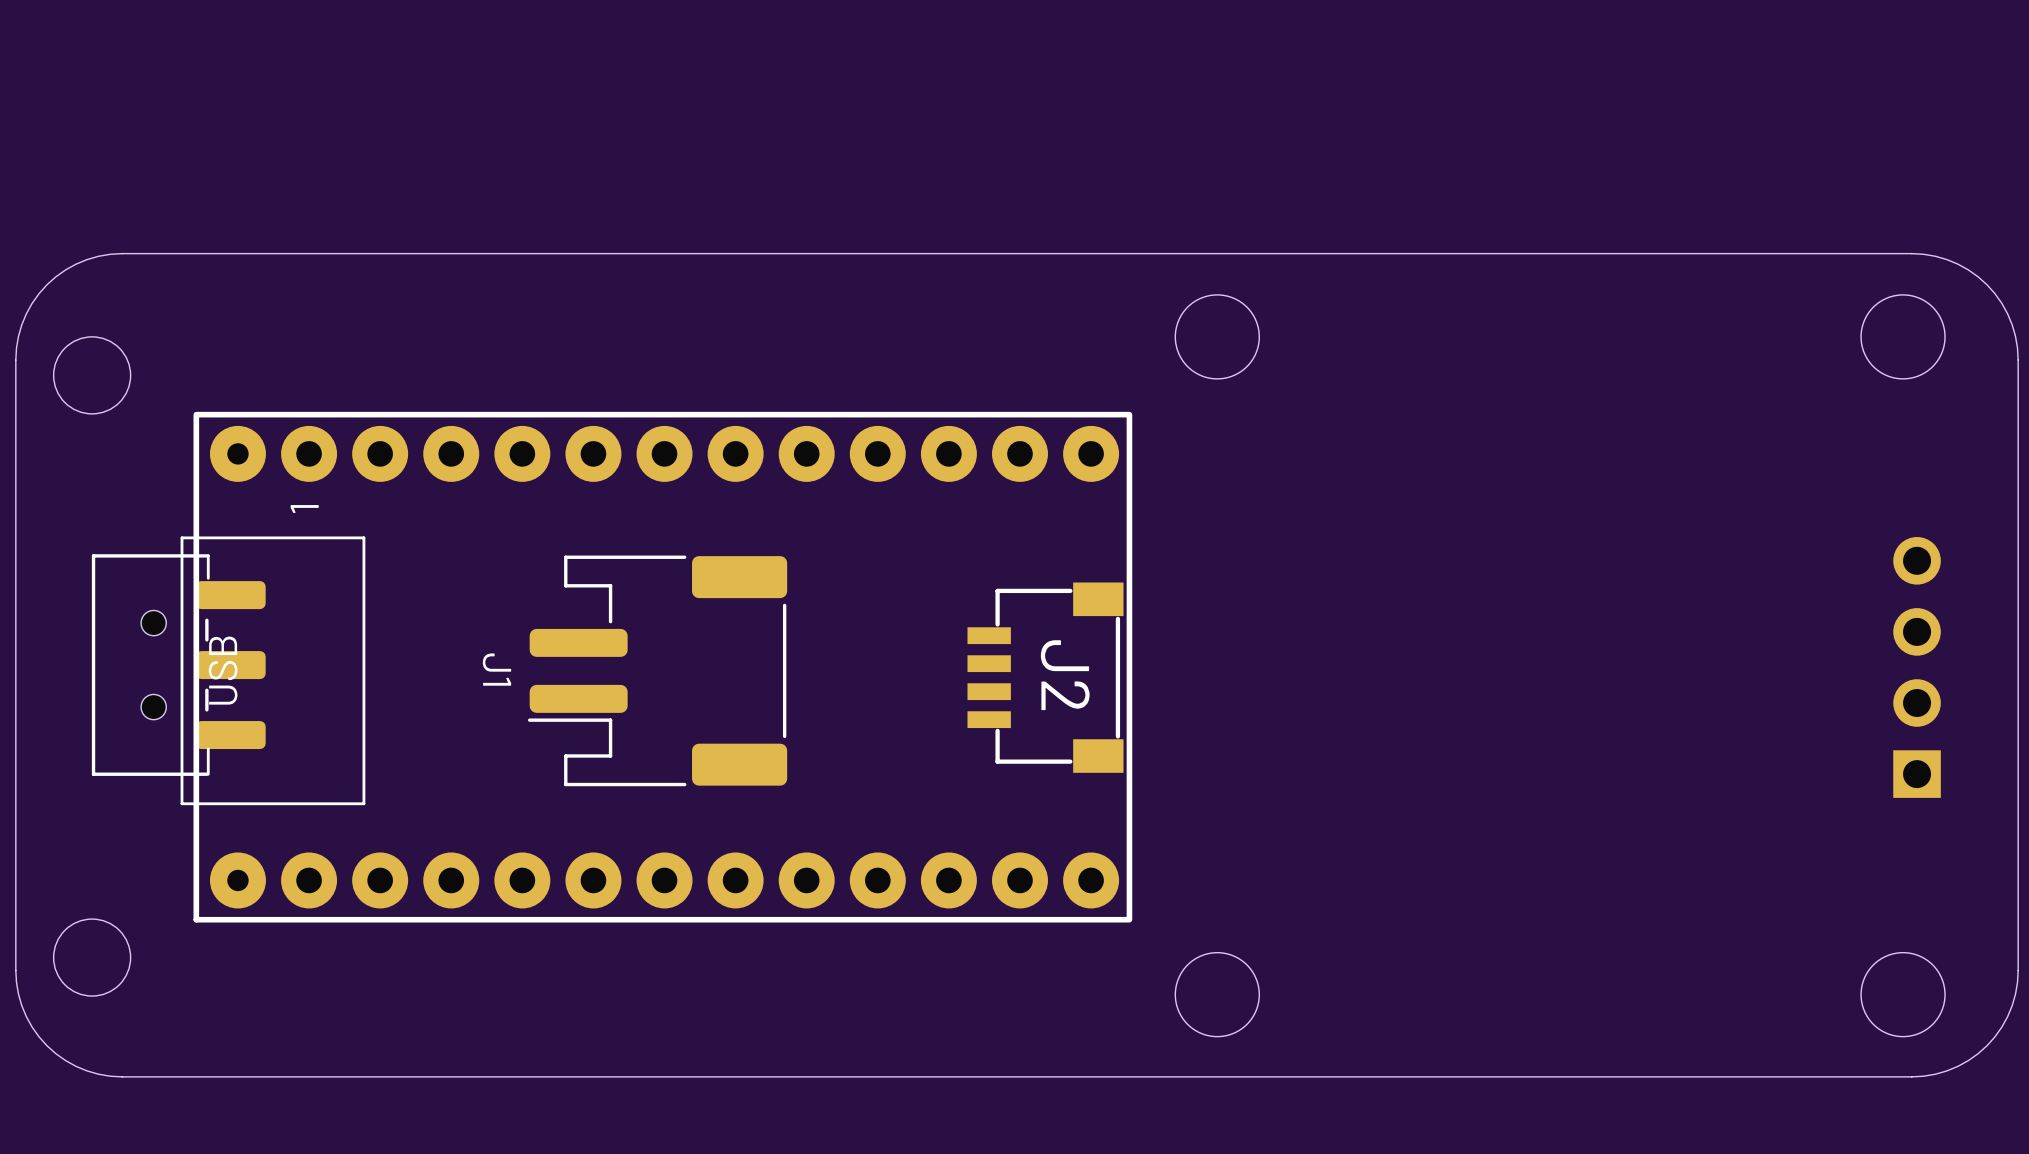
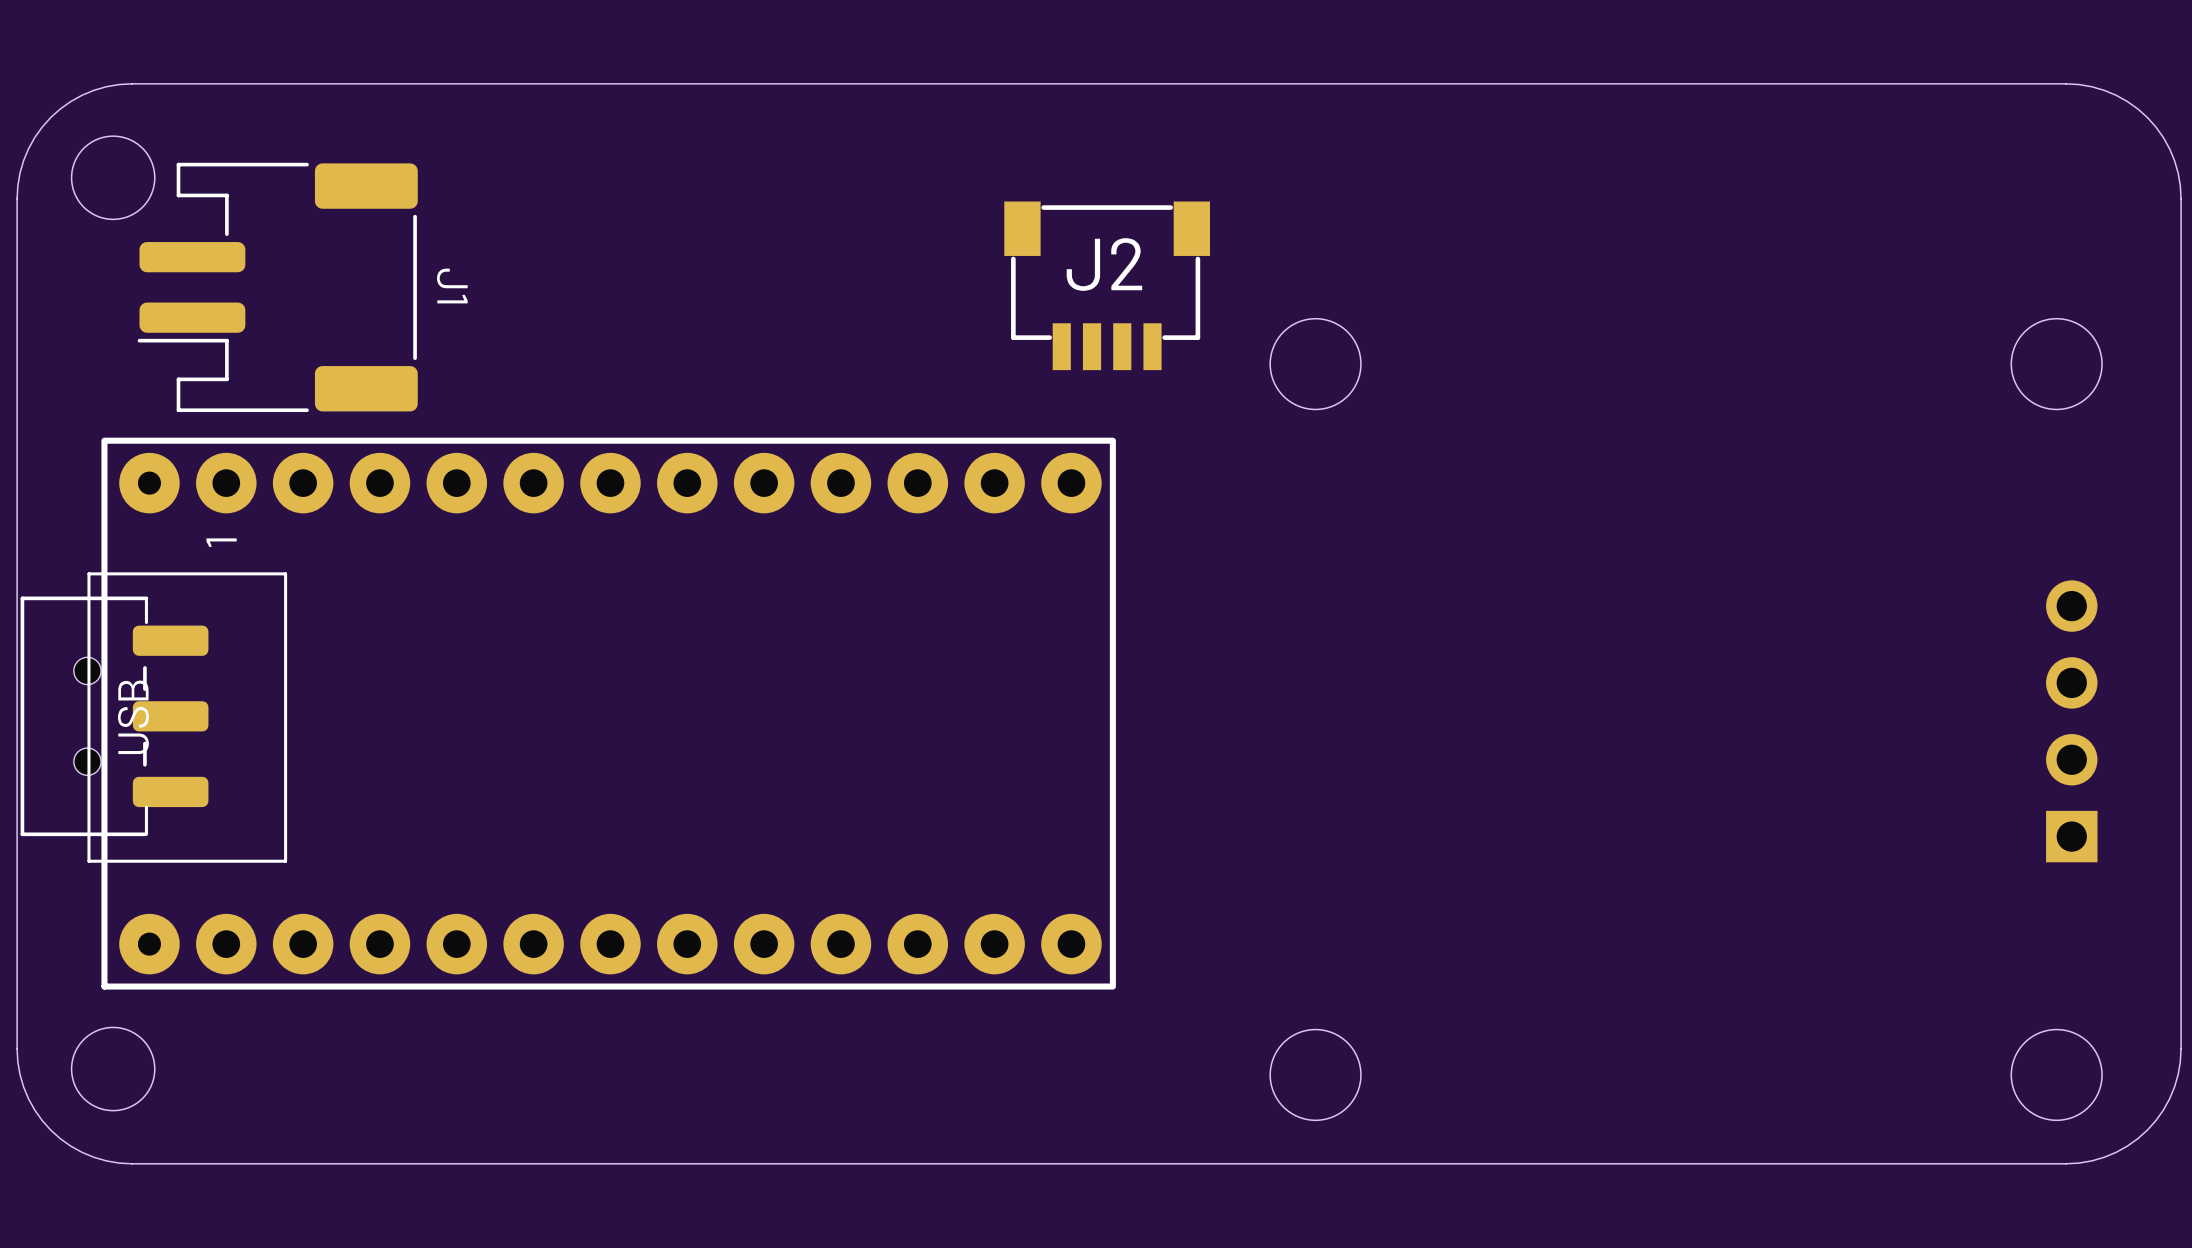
board edge: none -> (17, 198) (17, 389)
board edge: (2018, 359) (2015, 336) (2007, 313) (1987, 284) (1957, 264) (1935, 256) (1911, 253) (122, 253) (87, 259) (65, 269) (46, 284) (26, 313) (18, 336) (15, 359) -> (2181, 389) (2181, 198) (2174, 160) (2163, 137) (2137, 108) (2115, 95) (2078, 84) (132, 83) (94, 90) (70, 101) (50, 117) (28, 148) (19, 173) (17, 198)
round board edge position: (92, 375) -> (113, 177)
part position: (178, 665) -> (114, 716)
part position: (656, 667) -> (601, 713)
J1 name position: J1 (496, 669) -> J1 (452, 286)
J1 position: (657, 670) -> (277, 287)
J2 rotation: 0° (1045, 677) -> 90° counterclockwise (1107, 285)
J2 position: (1045, 677) -> (1107, 285)
round board edge position: (92, 957) -> (113, 1069)

